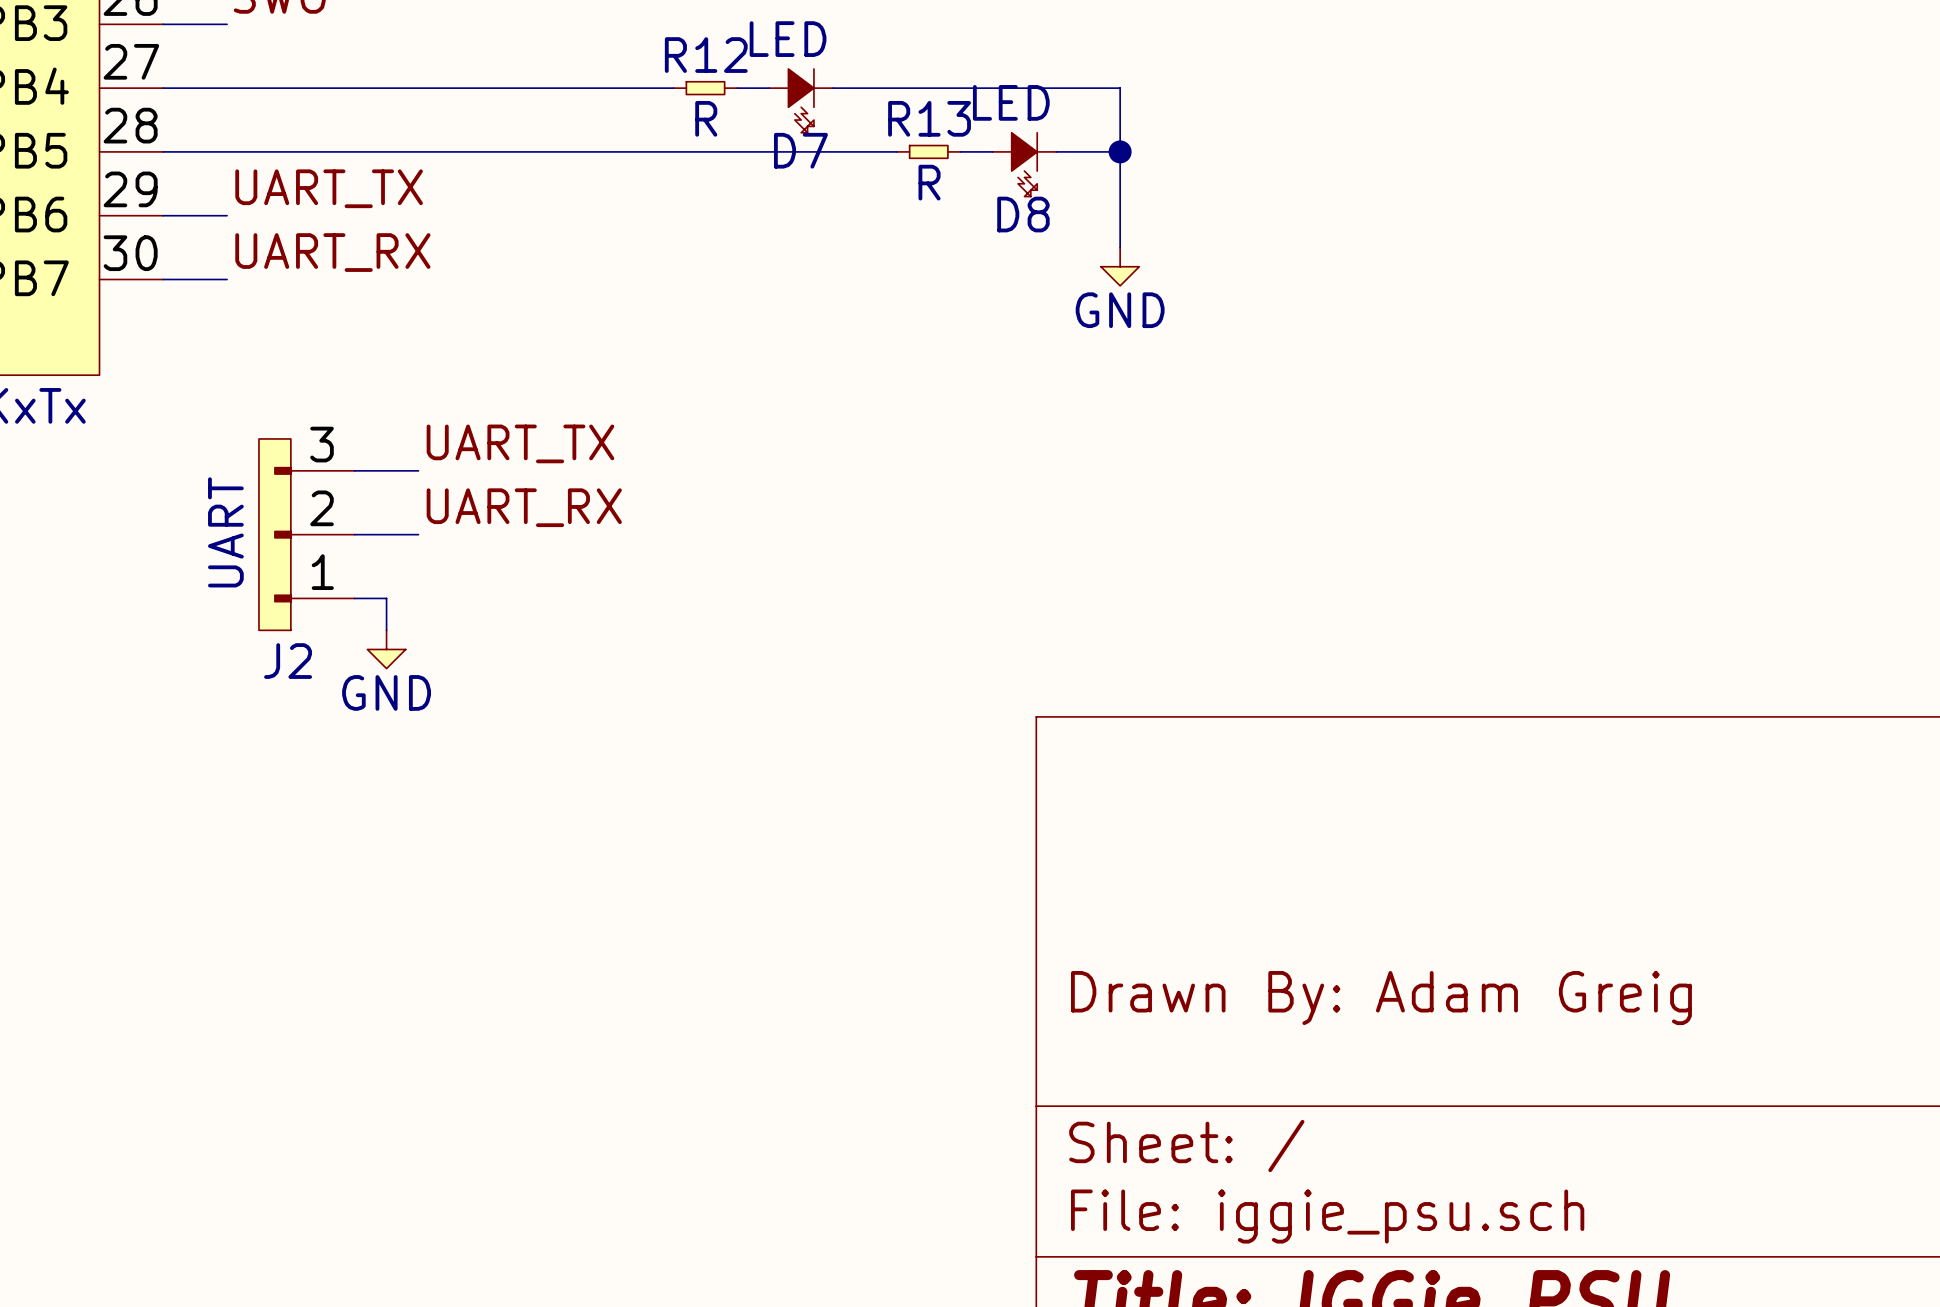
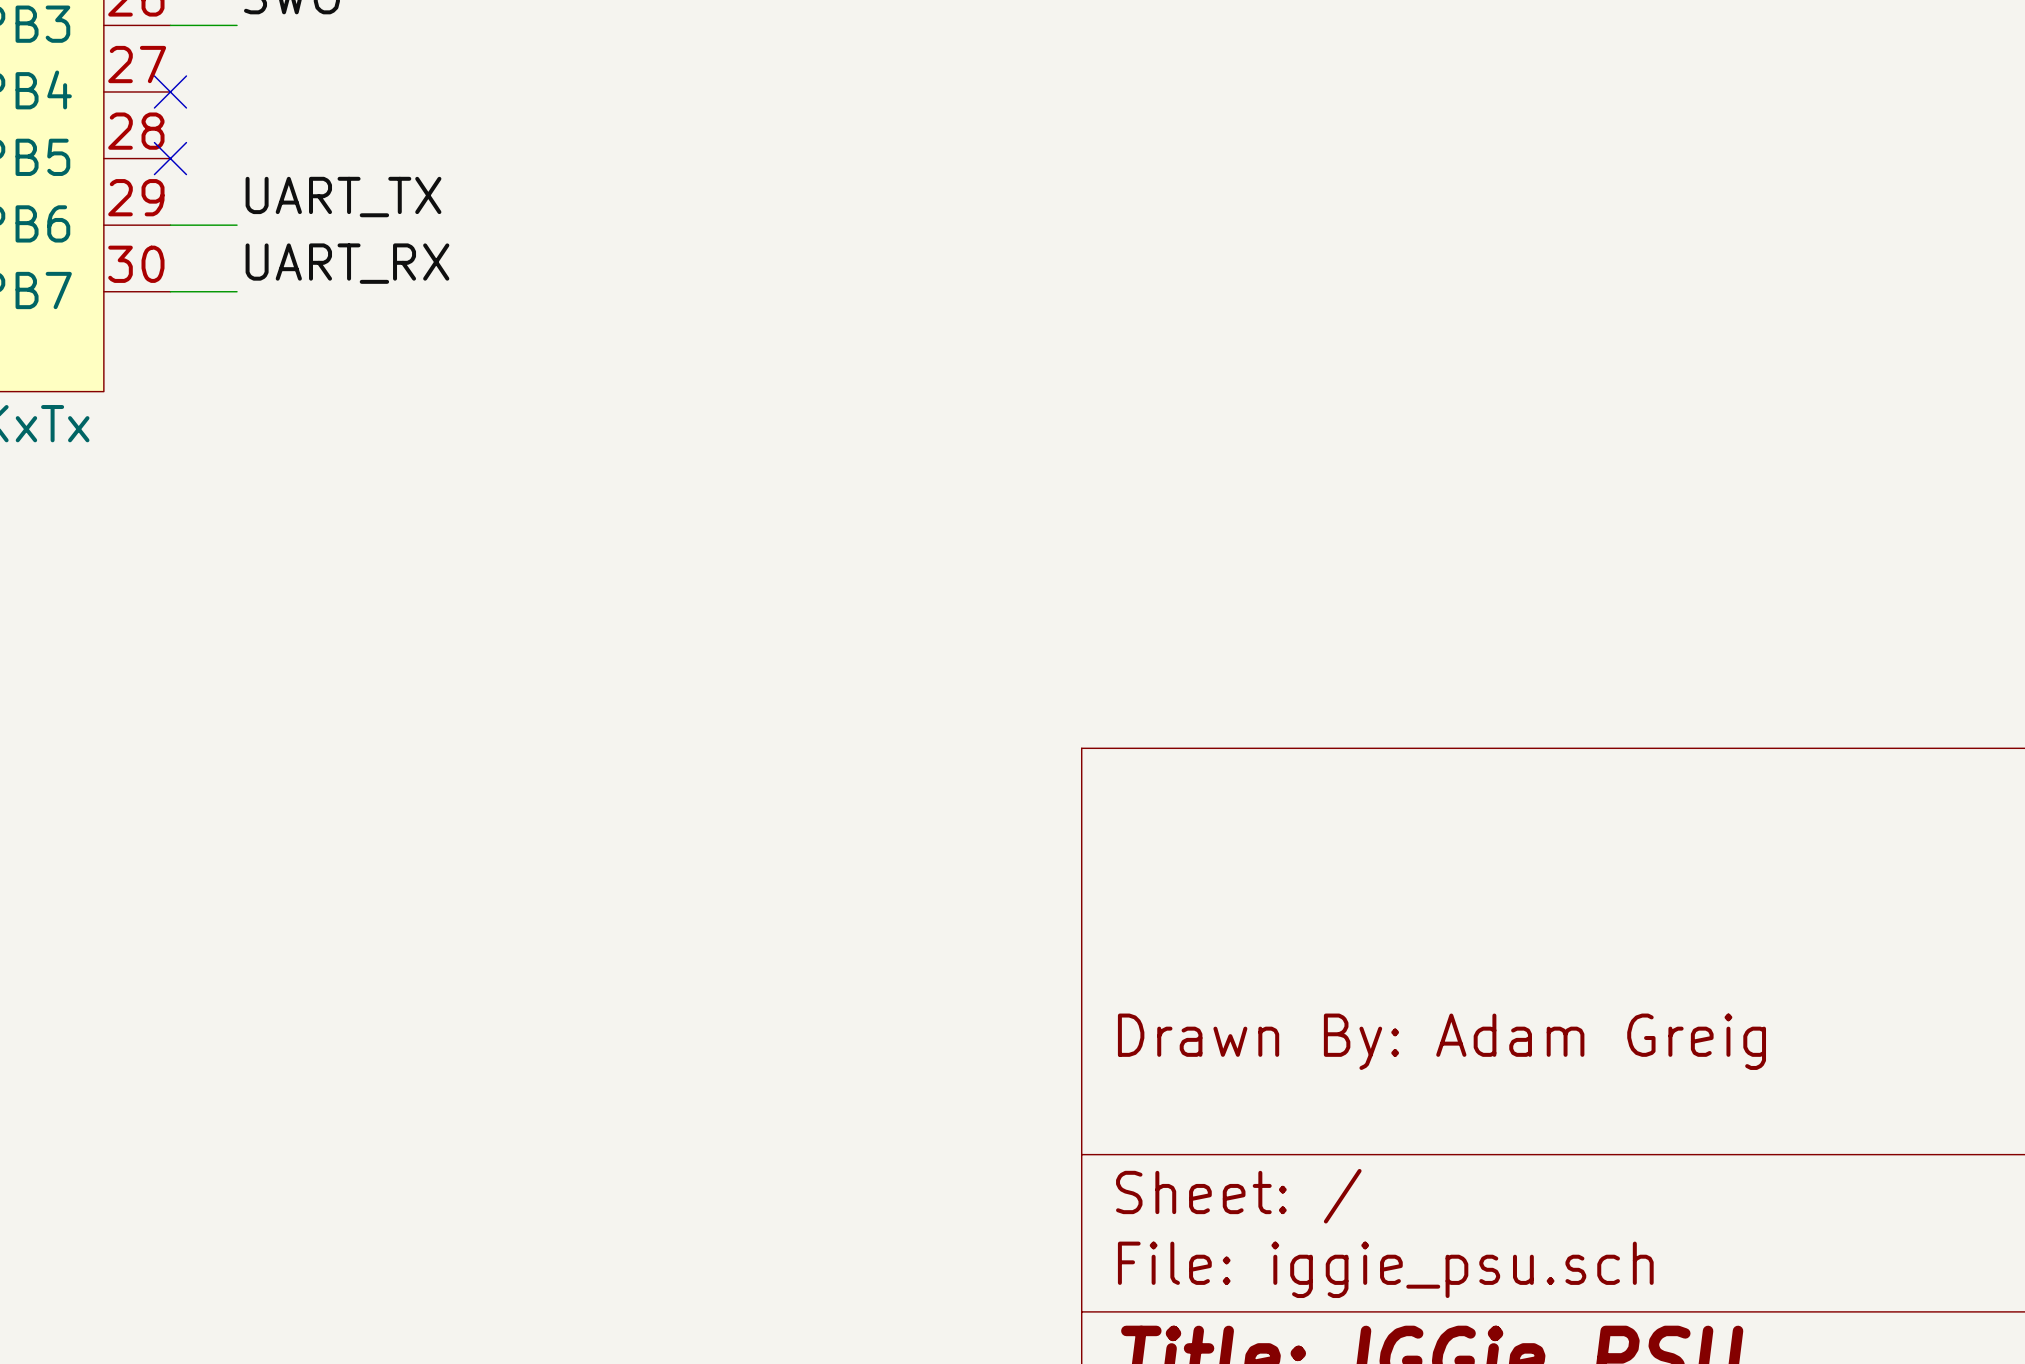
wire: (163, 88) (673, 88) -> none
no-connect mark: none -> (170, 91)
R12: R (705, 88) -> none
wire: (737, 88) (769, 88) -> none
wire: (833, 88) (1120, 88) (1120, 247) -> none
D7: LED (801, 100) -> none
wire: (163, 151) (896, 151) -> none
no-connect mark: none -> (170, 158)
R13: R (928, 151) -> none
wire: (960, 151) (992, 151) -> none
wire: (1056, 151) (1120, 151) -> none
junction: (1120, 151) -> none
D8: LED (1024, 164) -> none
power symbol: GND (1120, 266) -> none
label: UART_TX (520, 443) -> none
wire: (354, 470) (418, 470) -> none
label: UART_RX (524, 507) -> none
J2: UART (306, 534) -> none
wire: (354, 534) (418, 534) -> none
wire: (354, 598) (386, 598) (386, 630) -> none
power symbol: GND (386, 649) -> none

